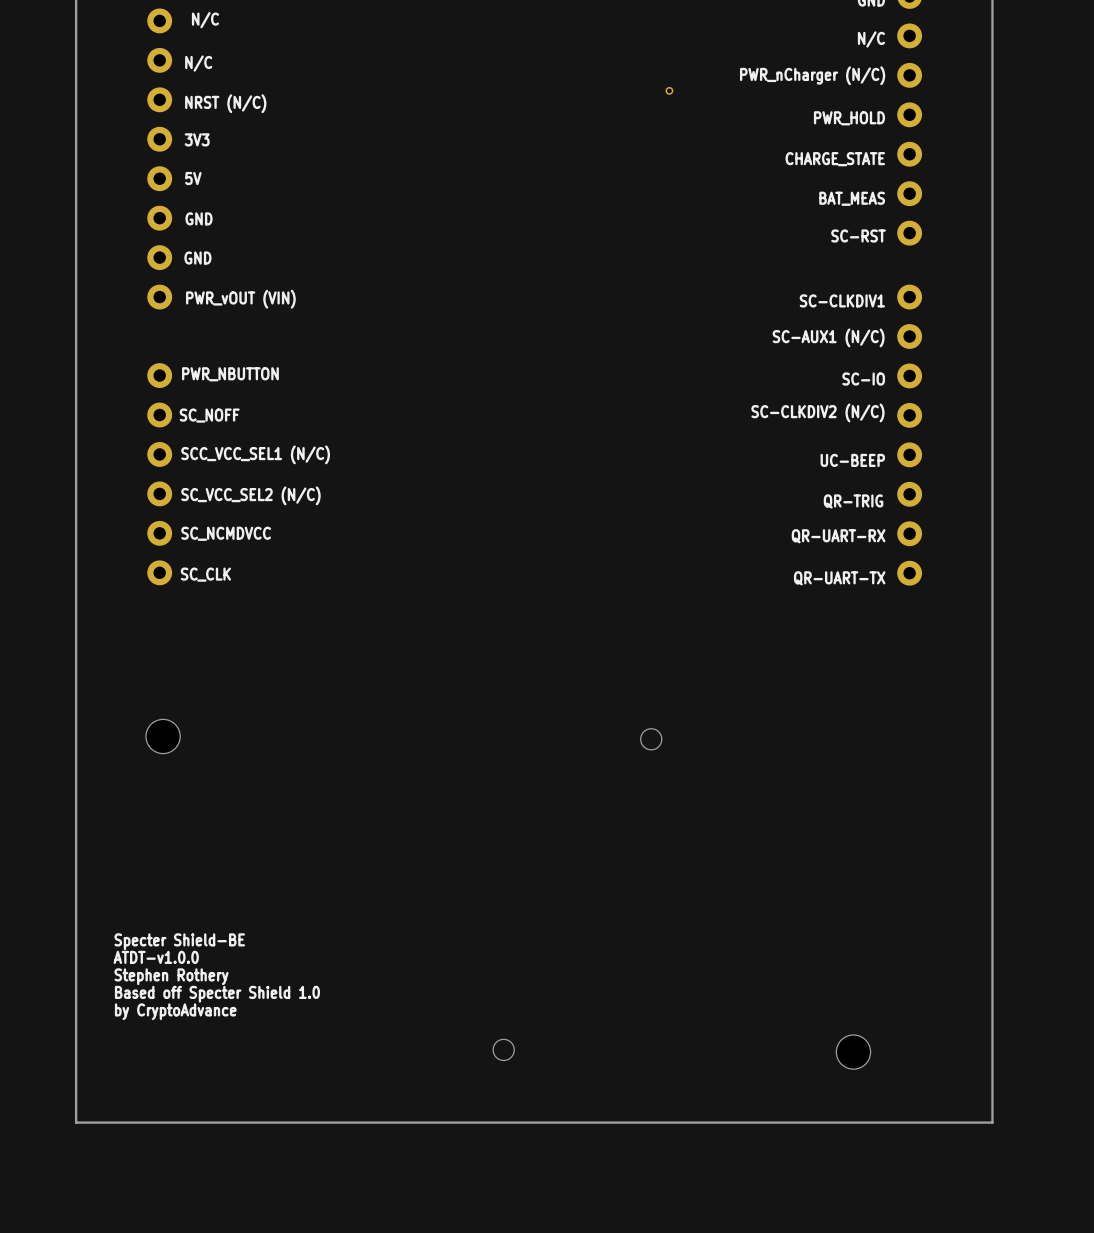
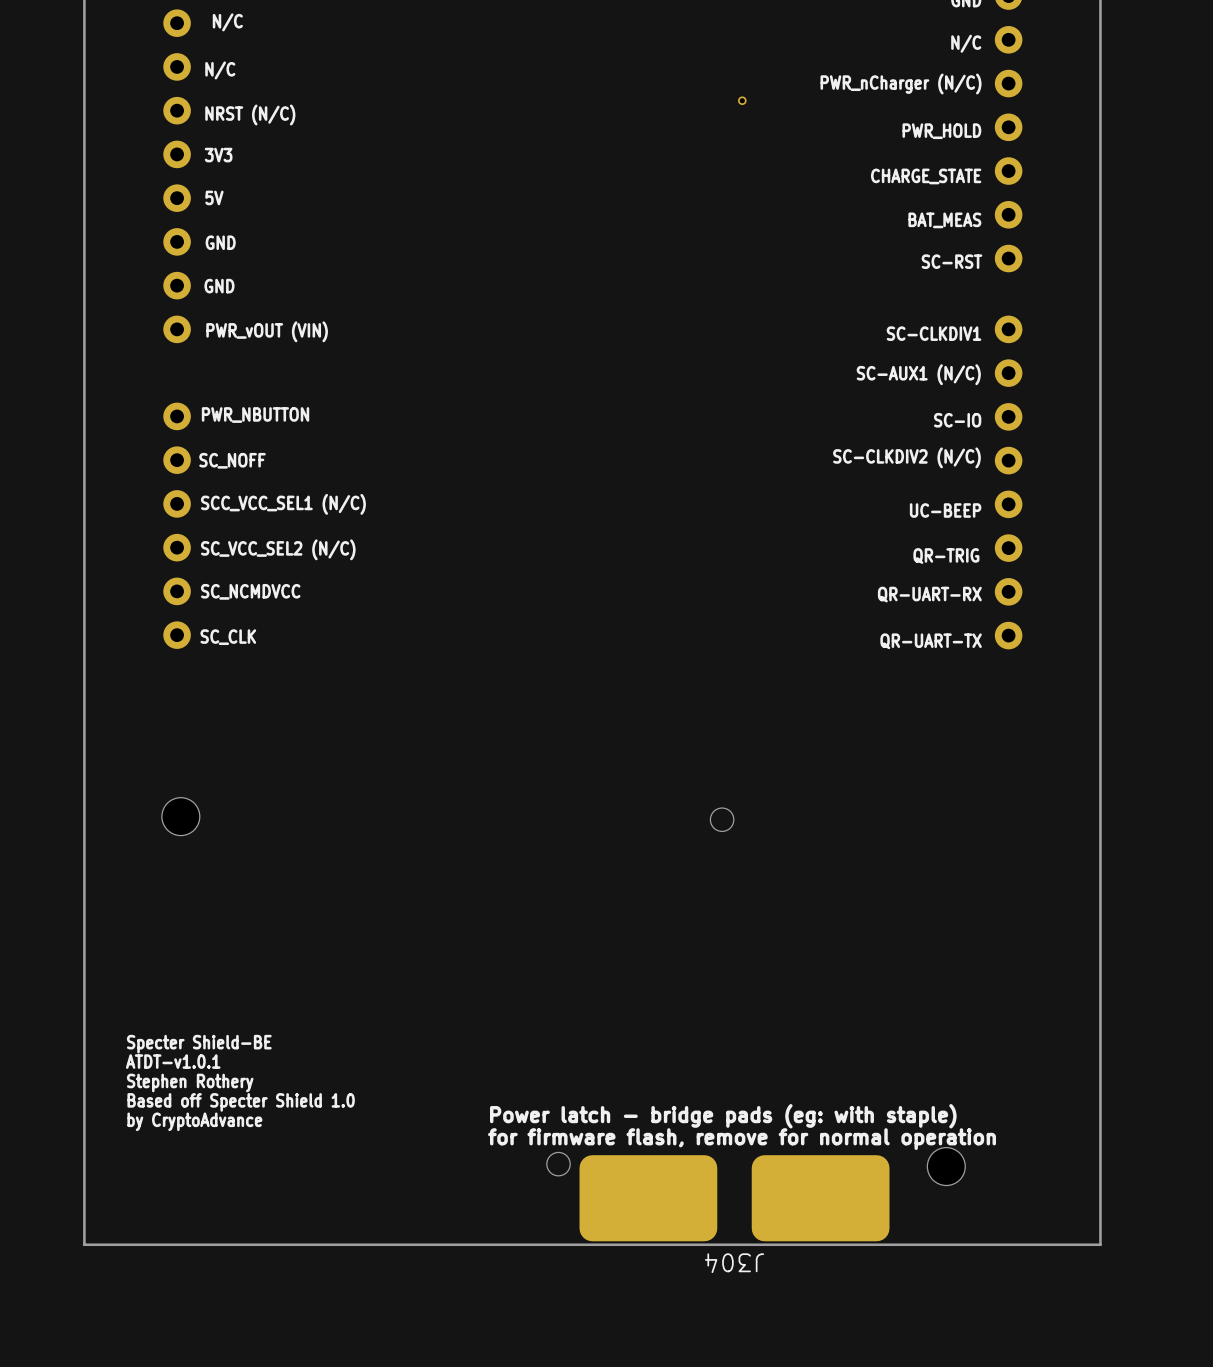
text: ATDT-v1.0.0 (156, 957) -> ATDT-v1.0.1 (173, 1061)
text: none -> Power latch - bridge pads (eg: with staple) (723, 1116)
text: none -> for firmware flash, remove for normal operation (742, 1139)
J304: none -> (734, 1198)

